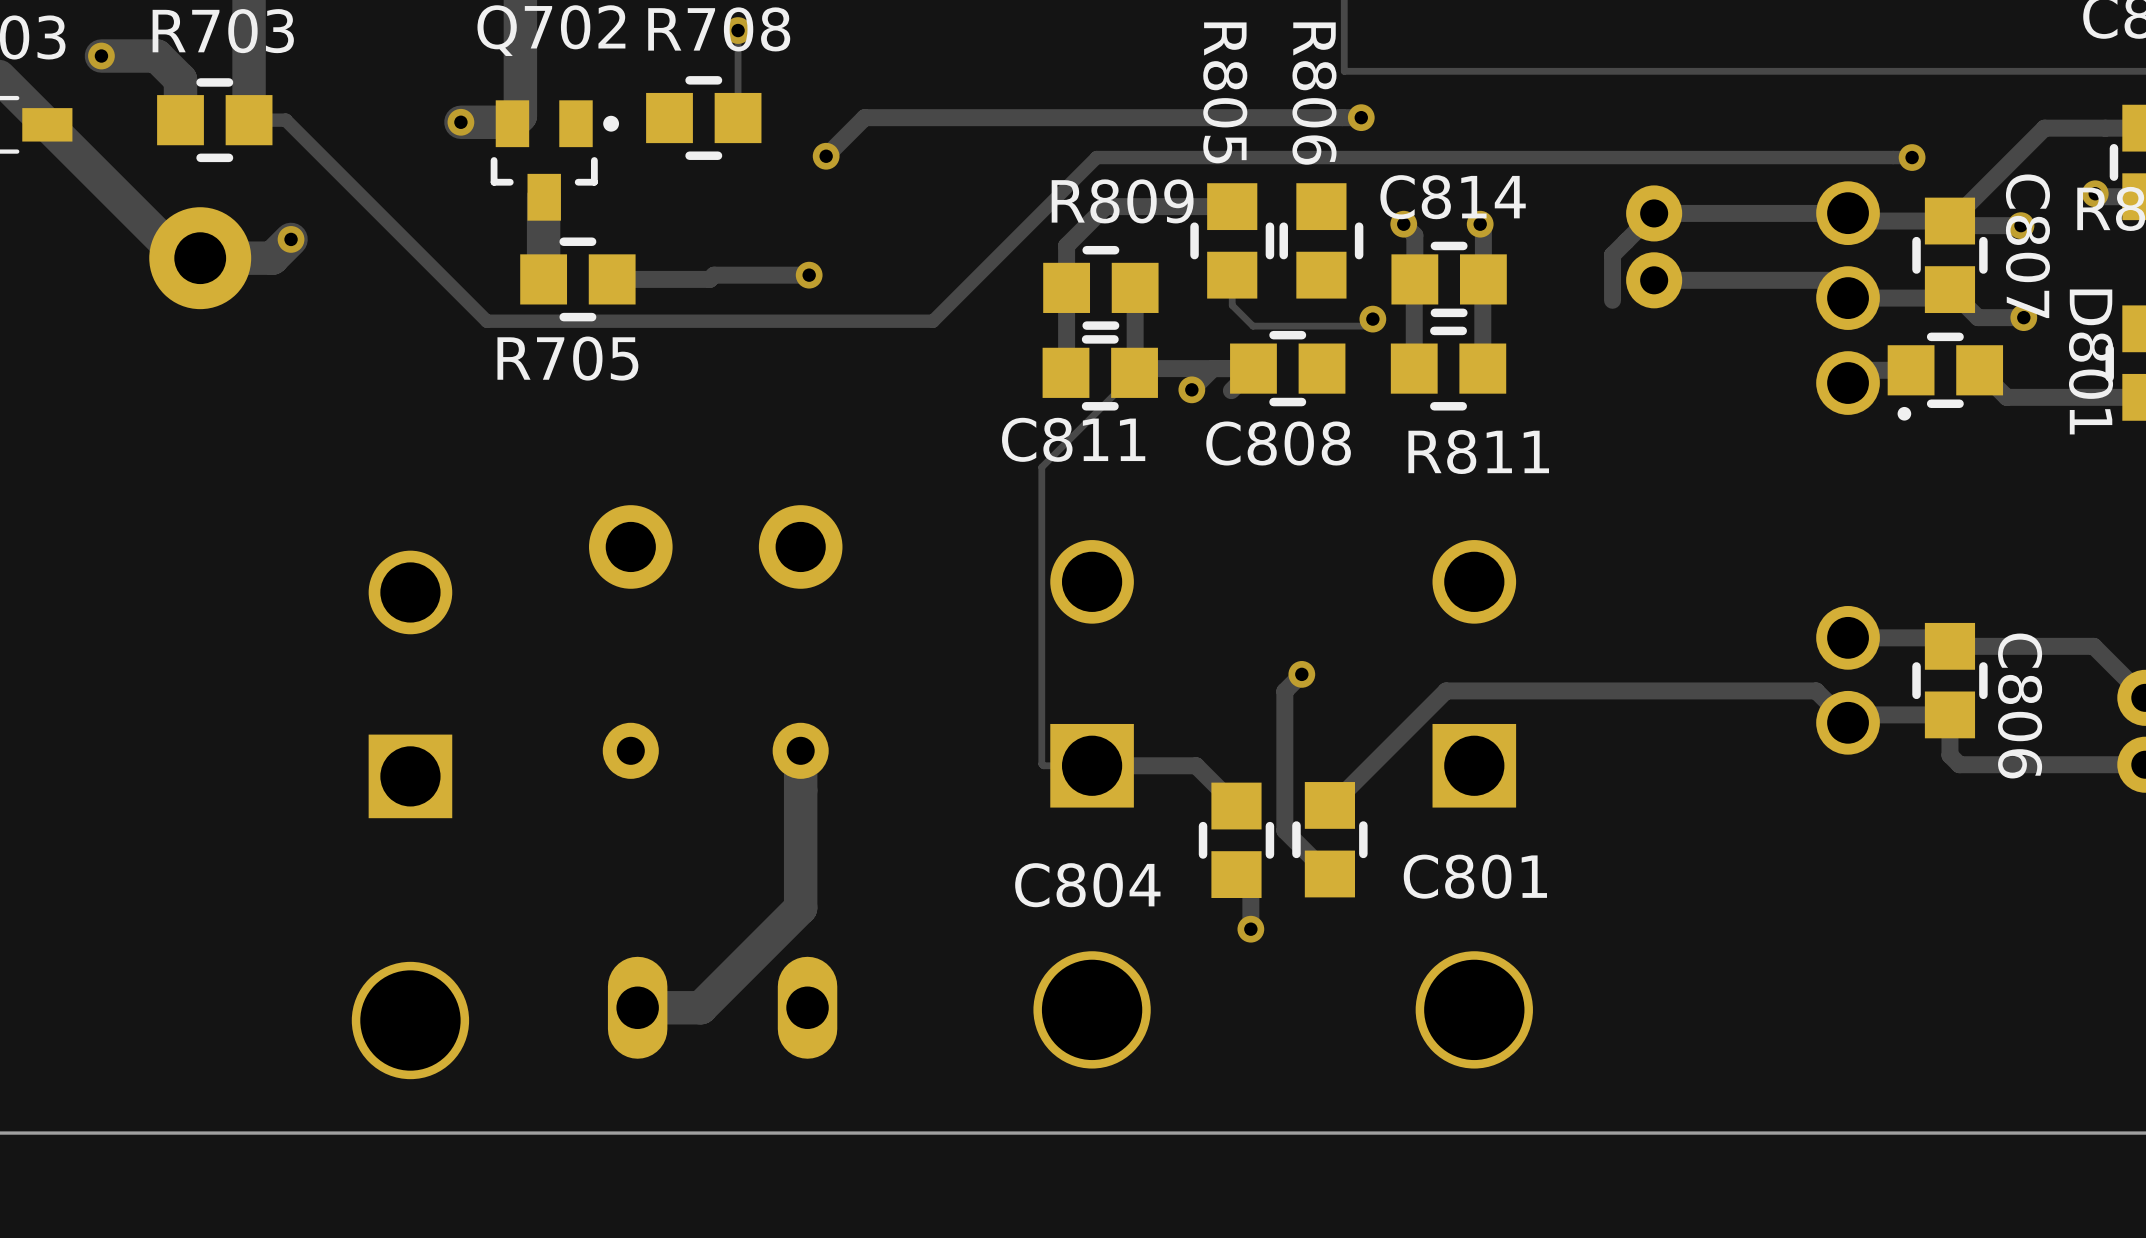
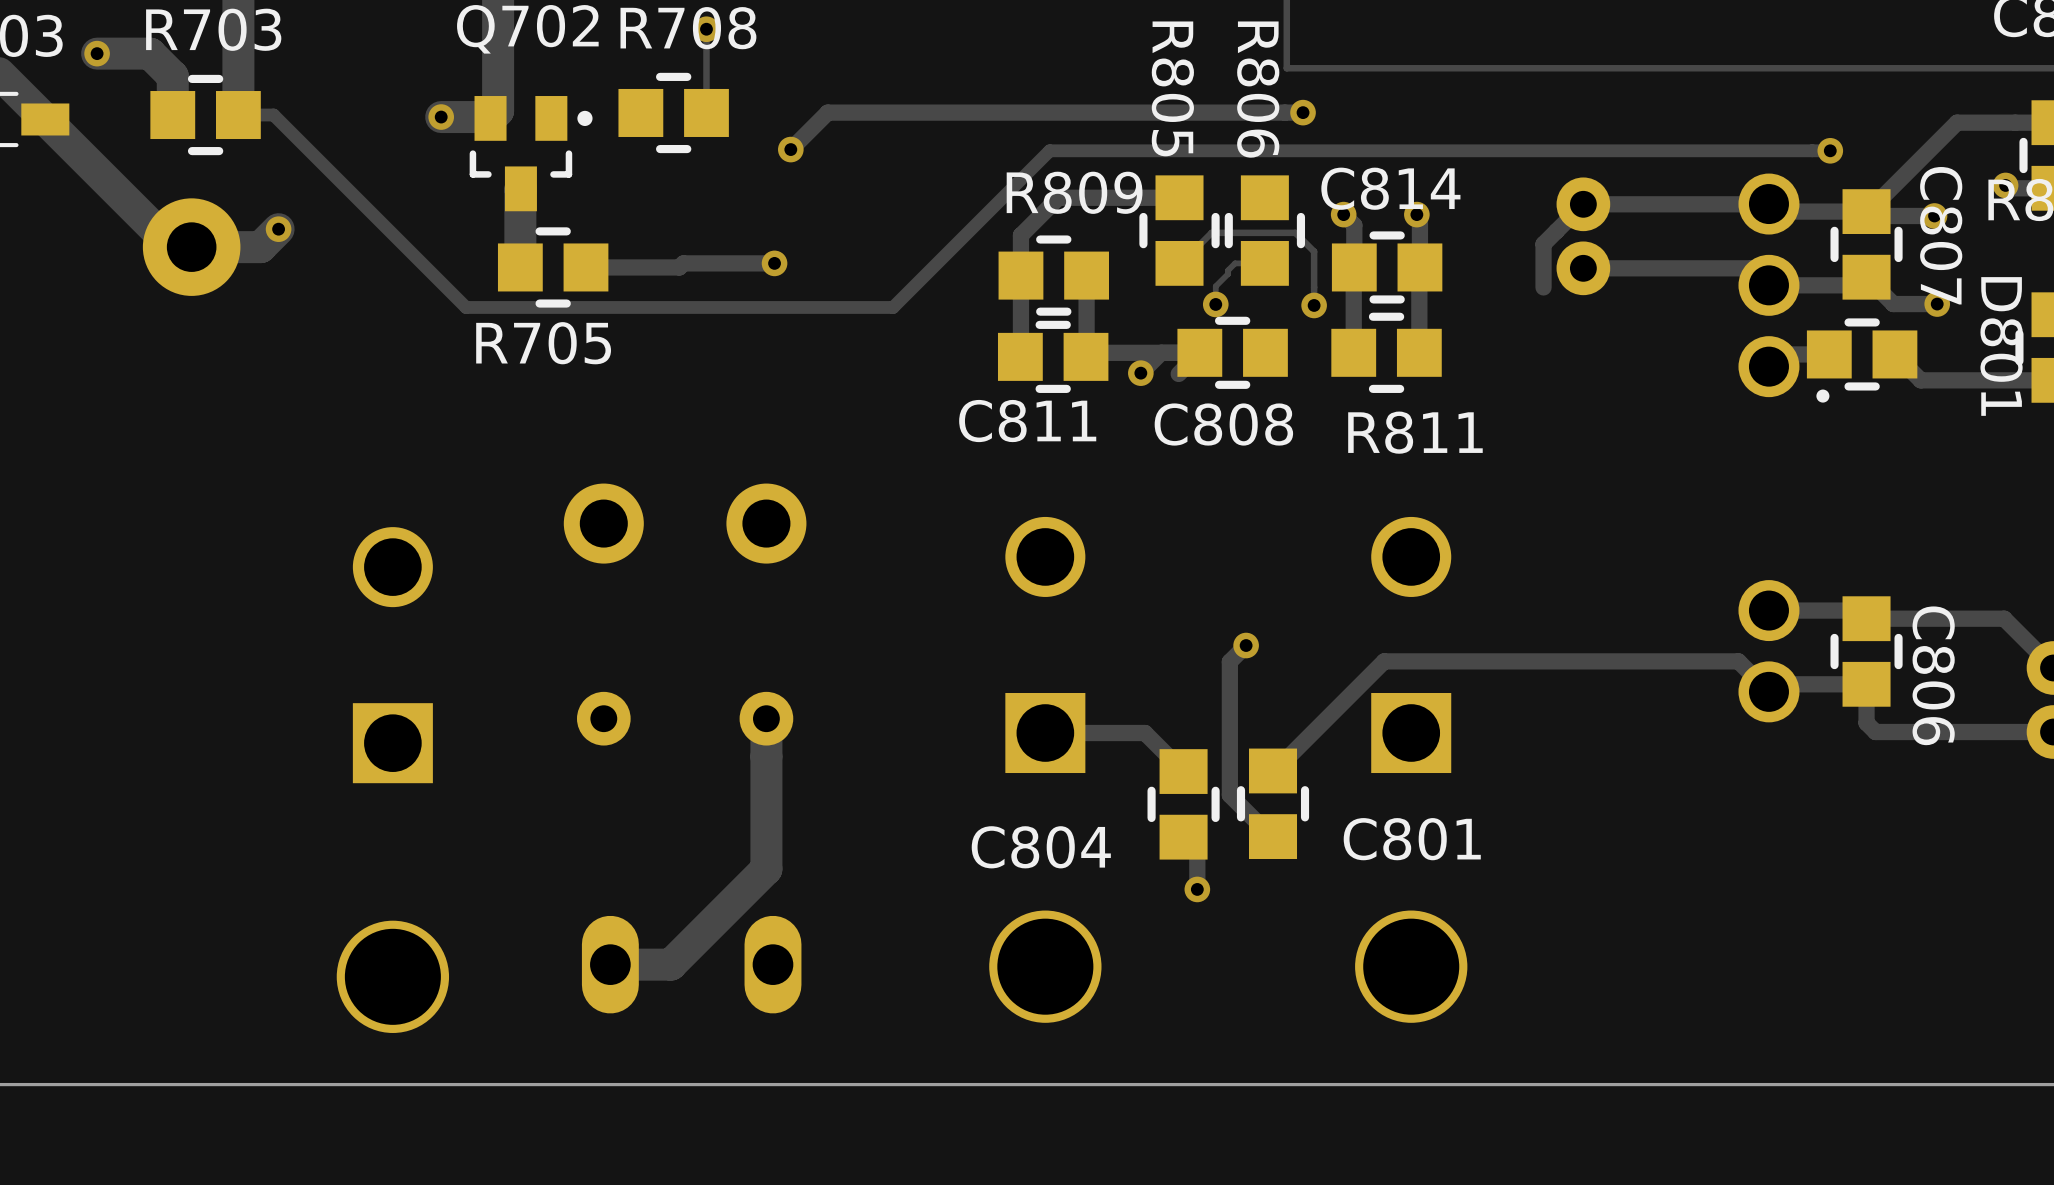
track: (1232, 275) (1232, 305) (1252, 326) (1365, 326) (1372, 319) -> (1179, 263) (1211, 232) (1295, 232) (1314, 251) (1314, 305)
track: none -> (1264, 263) (1235, 263) (1215, 286) (1215, 304)
via: none -> (1215, 304)
track: (1134, 374) (1041, 467) (1041, 764) (1043, 765) (1092, 765) -> none

